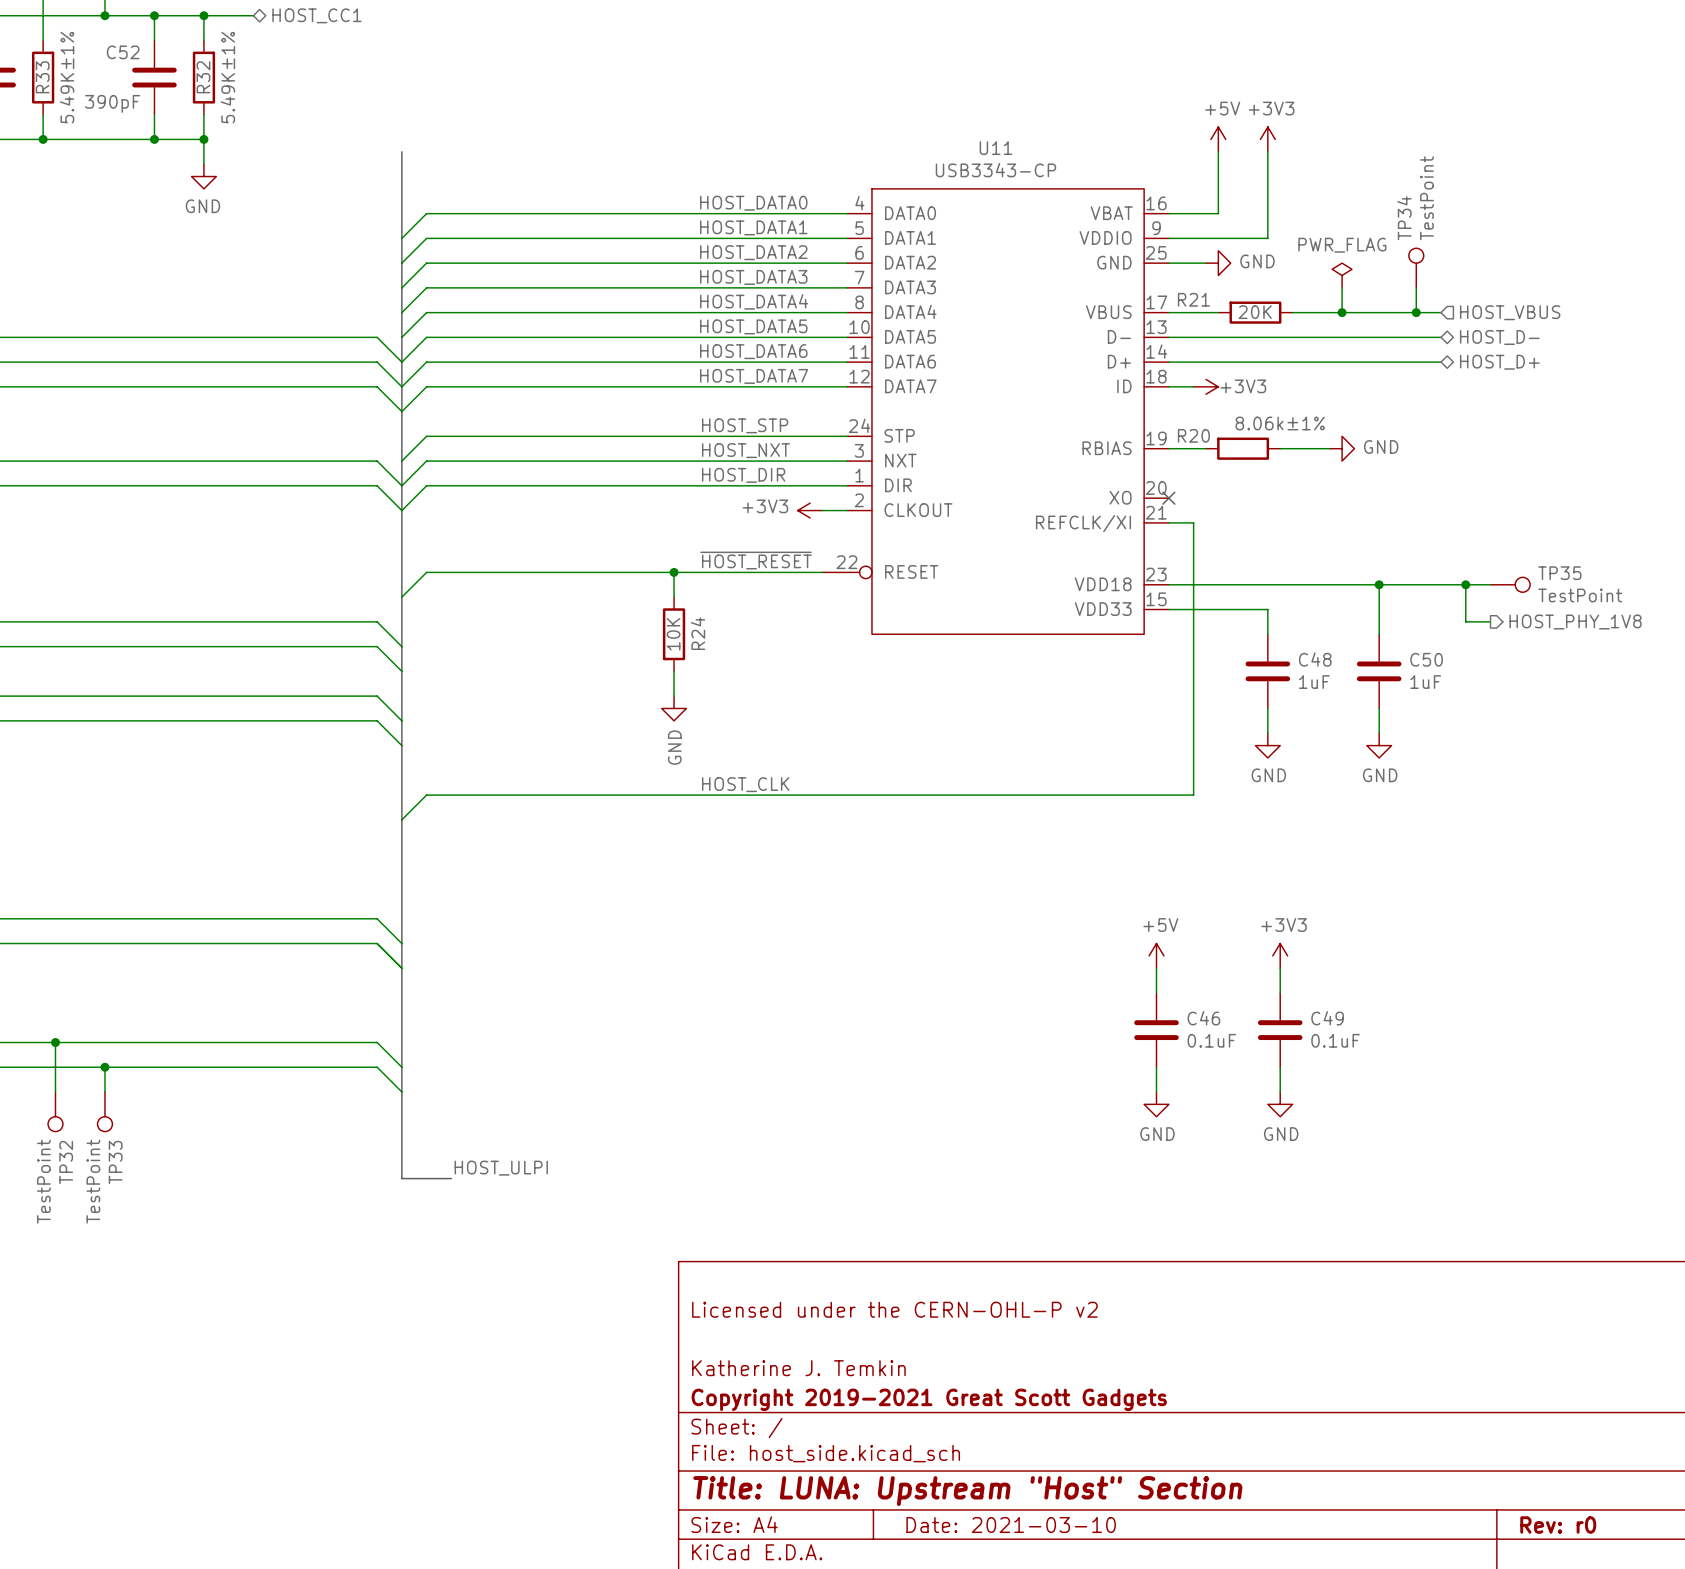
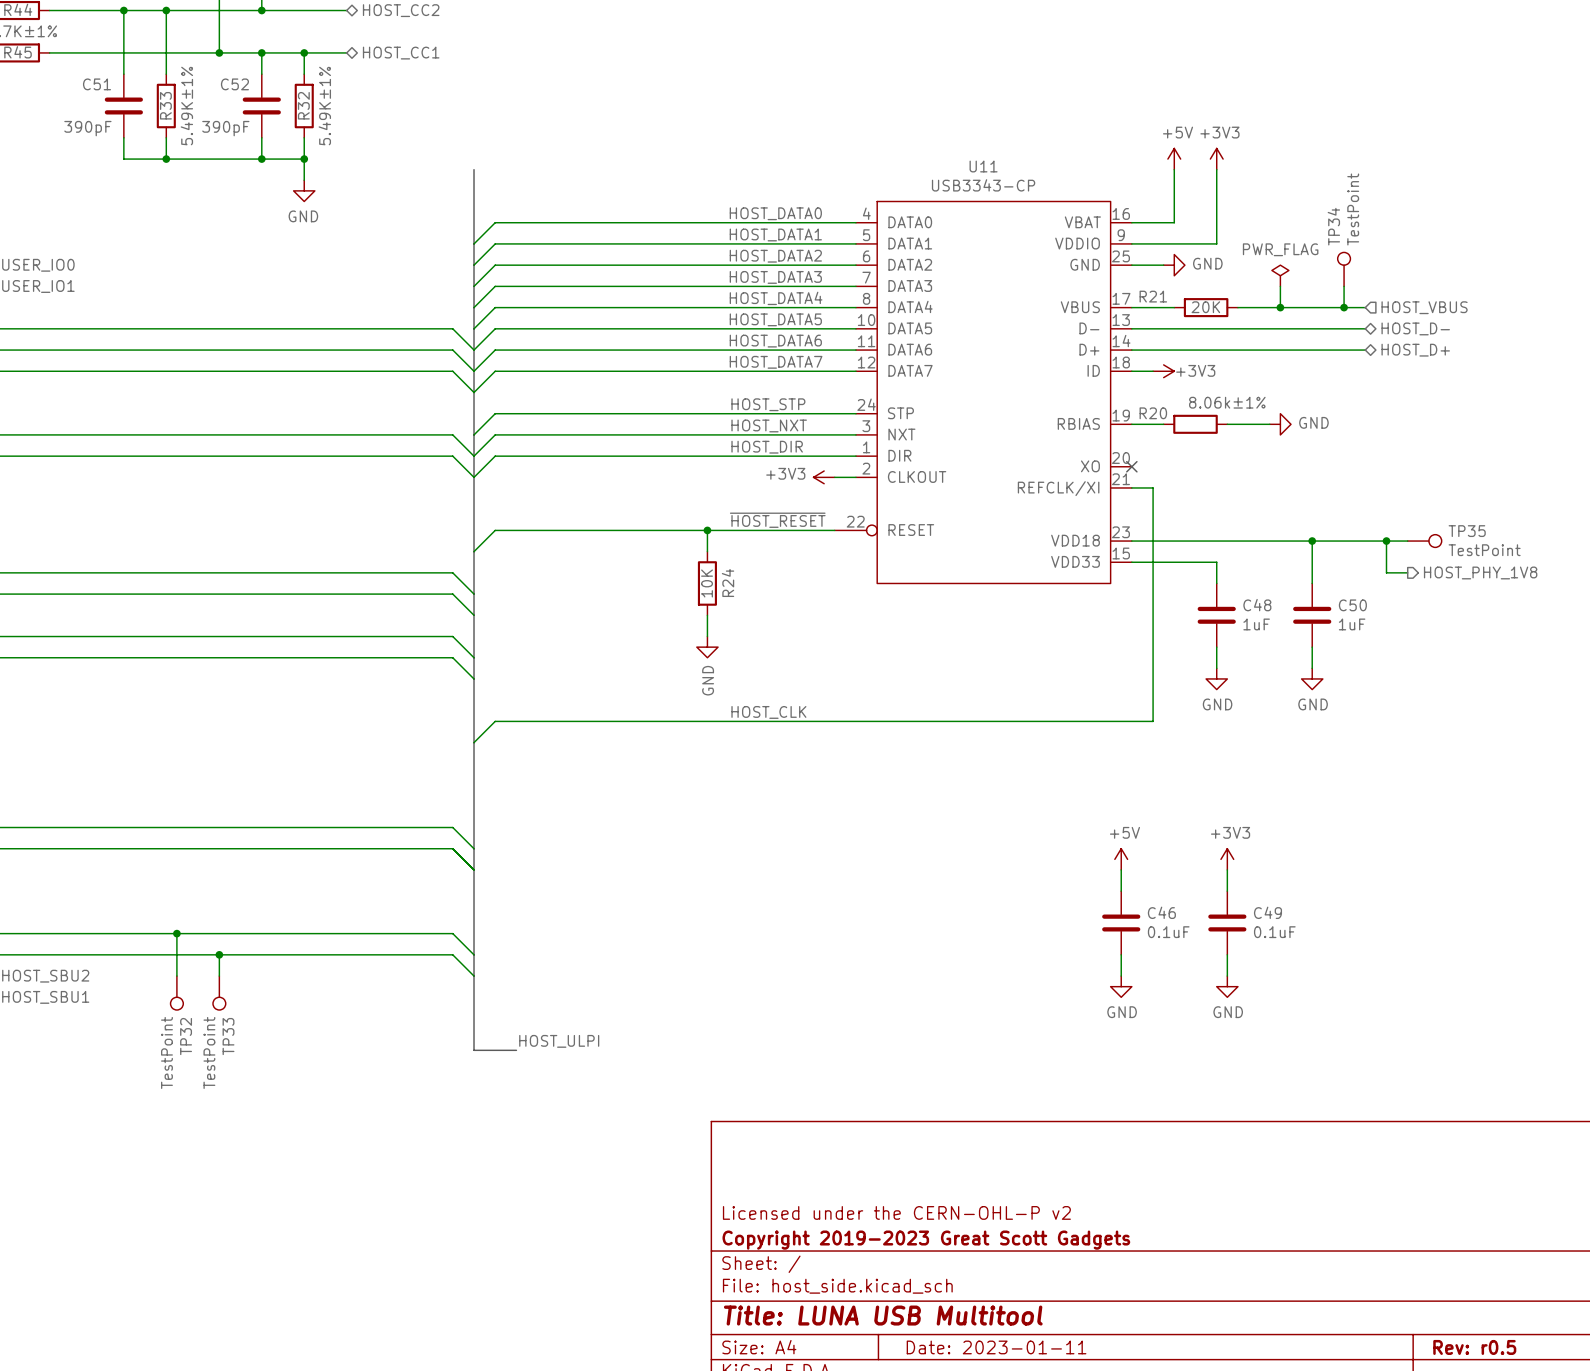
title block: Licensed under the CERN-OHL-P v2 (894, 1309) -> none
title block: Katherine J. Temkin (798, 1368) -> Licensed under the CERN-OHL-P v2 (896, 1212)
title block: Copyright 2019-2021 Great Scott Gadgets (929, 1399) -> Copyright 2019-2023 Great Scott Gadgets (926, 1240)
title block: Title: LUNA: Upstream "Host" Section (967, 1491) -> Title: LUNA USB Multitool (883, 1315)
title block: Date: 2021-03-10 (1011, 1525) -> Date: 2023-01-11 (996, 1347)
title block: Rev: r0 (1558, 1525) -> Rev: r0.5 (1474, 1347)

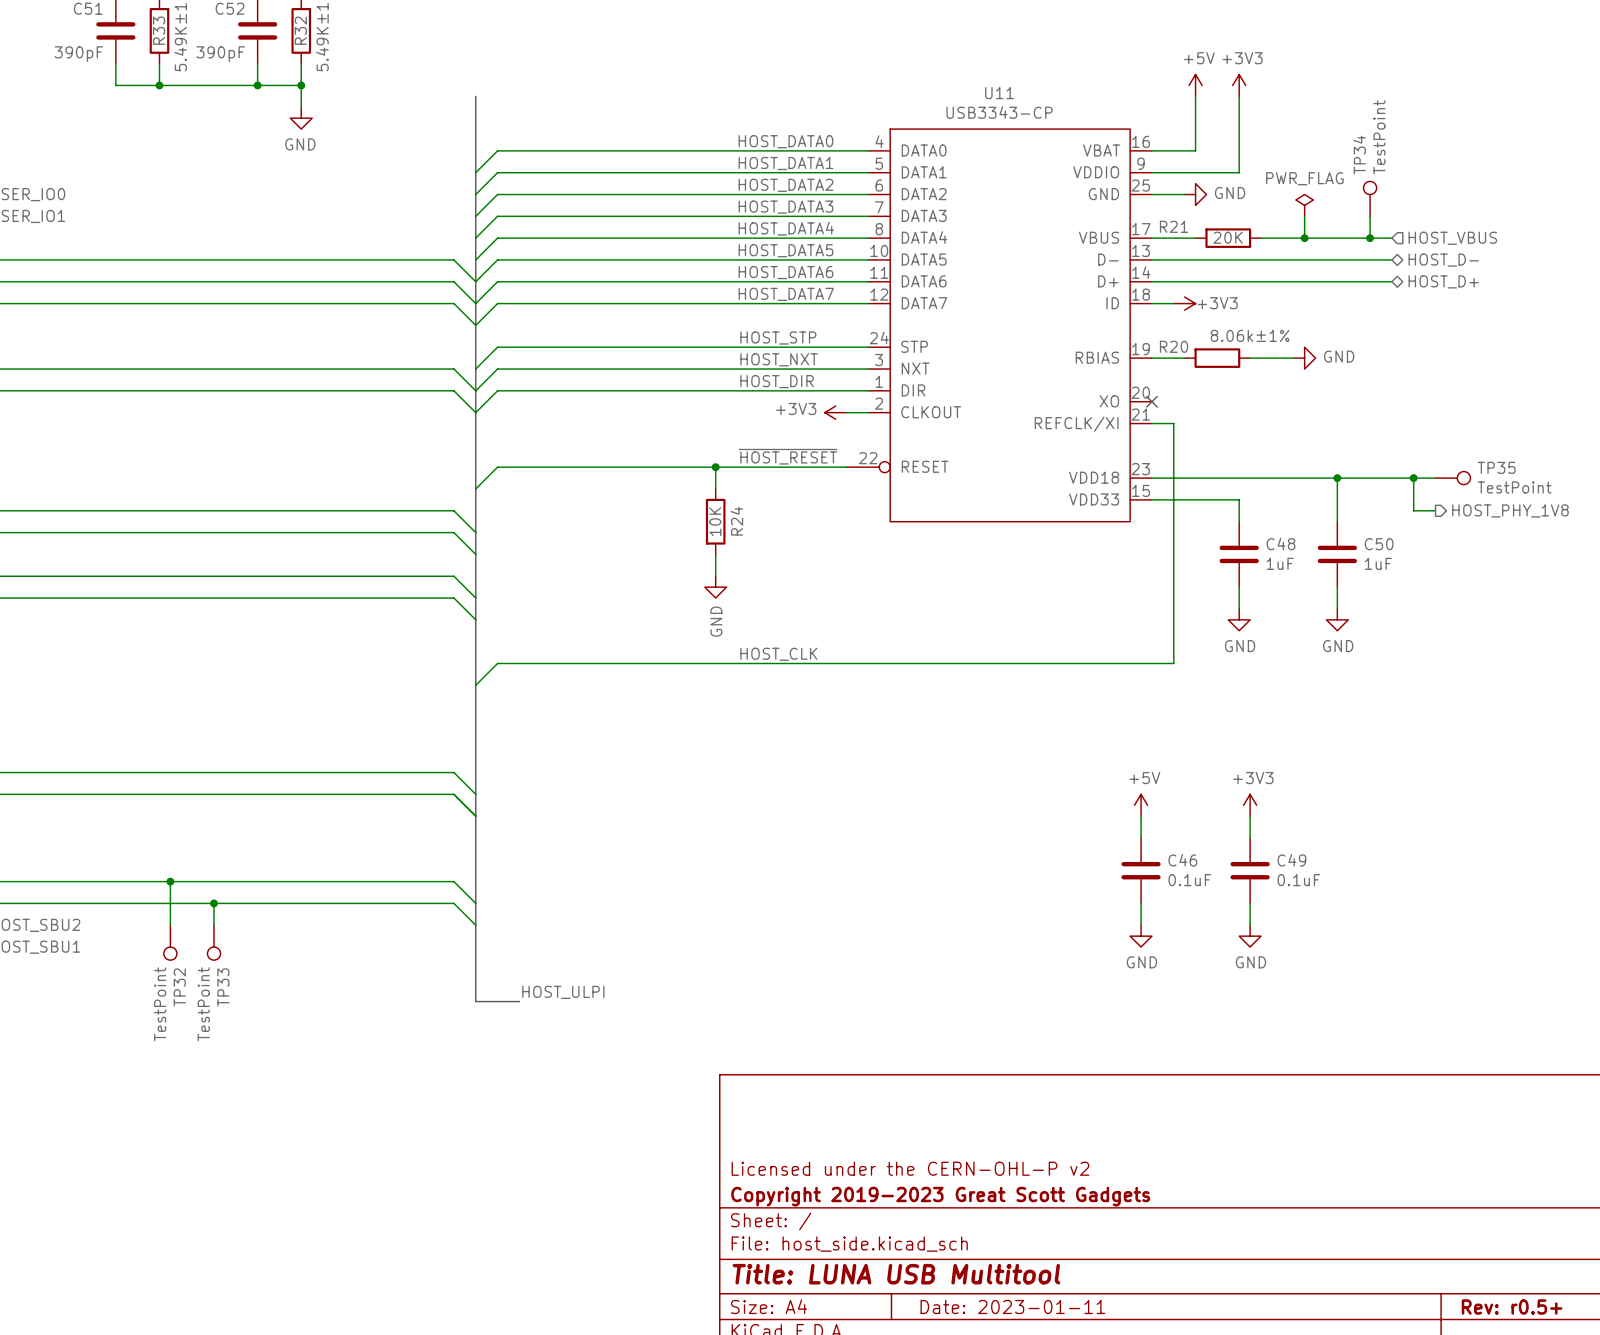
title block: Rev: r0.5 (1474, 1347) -> Rev: r0.5+ (1512, 1307)

